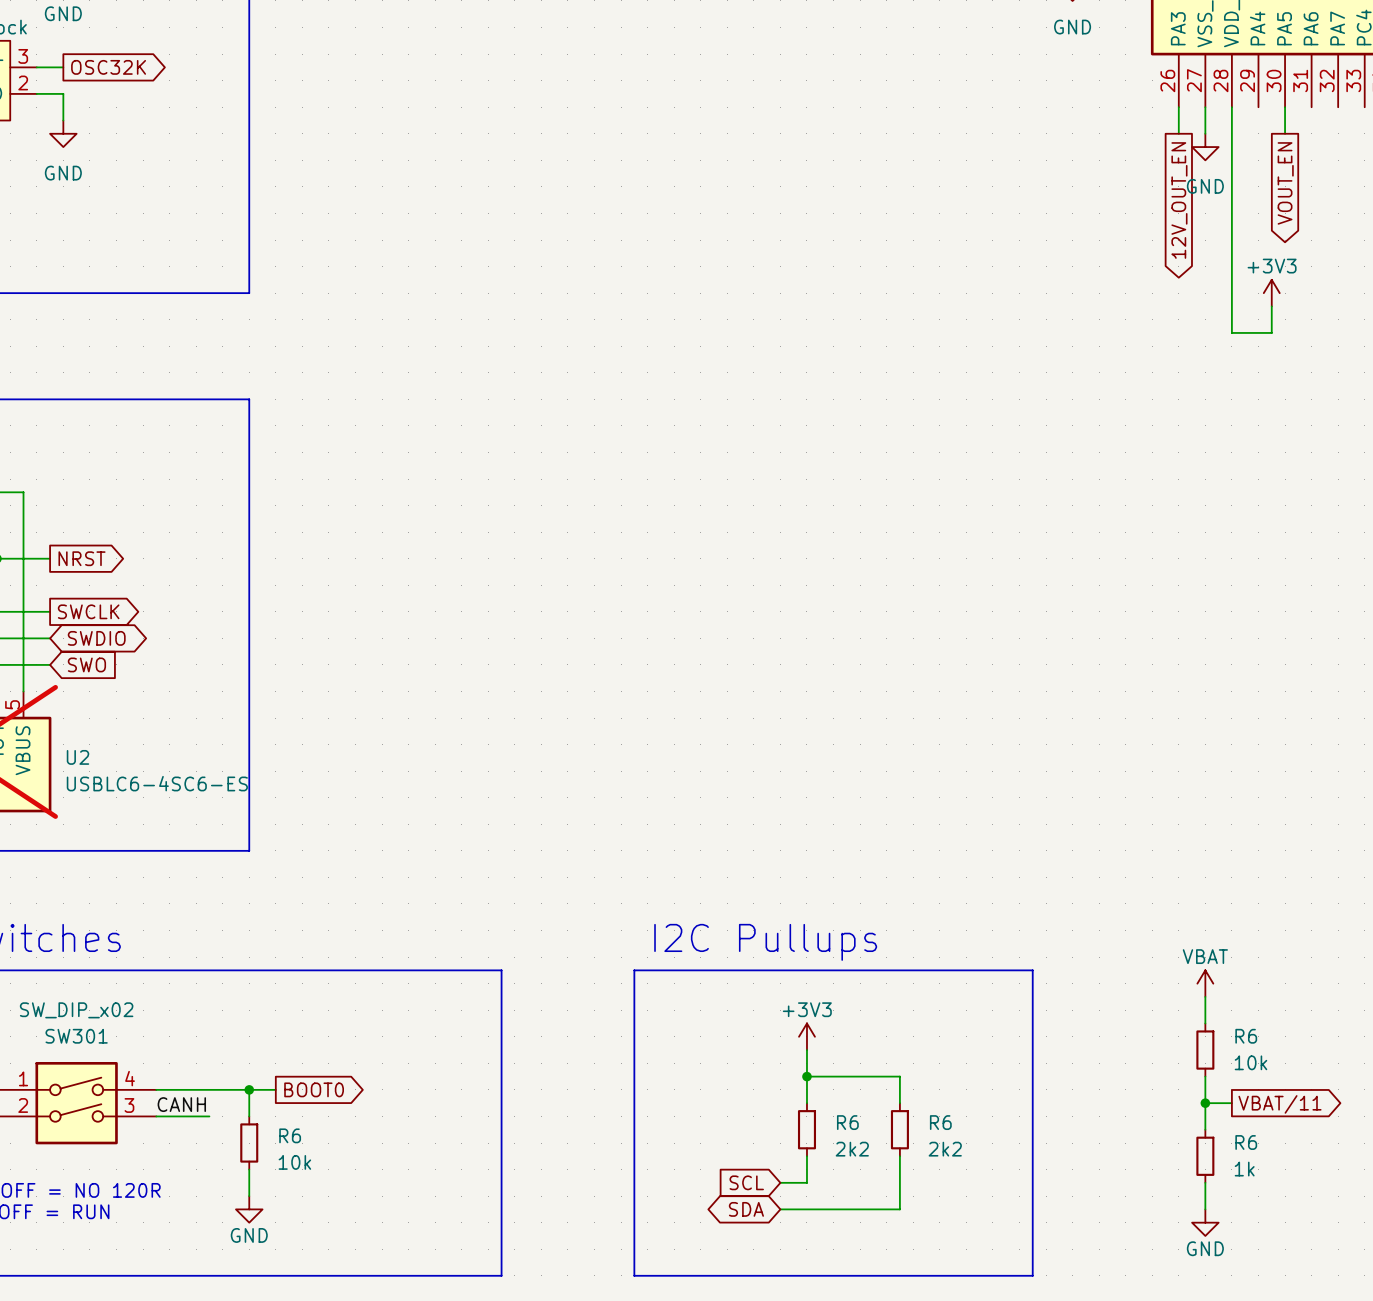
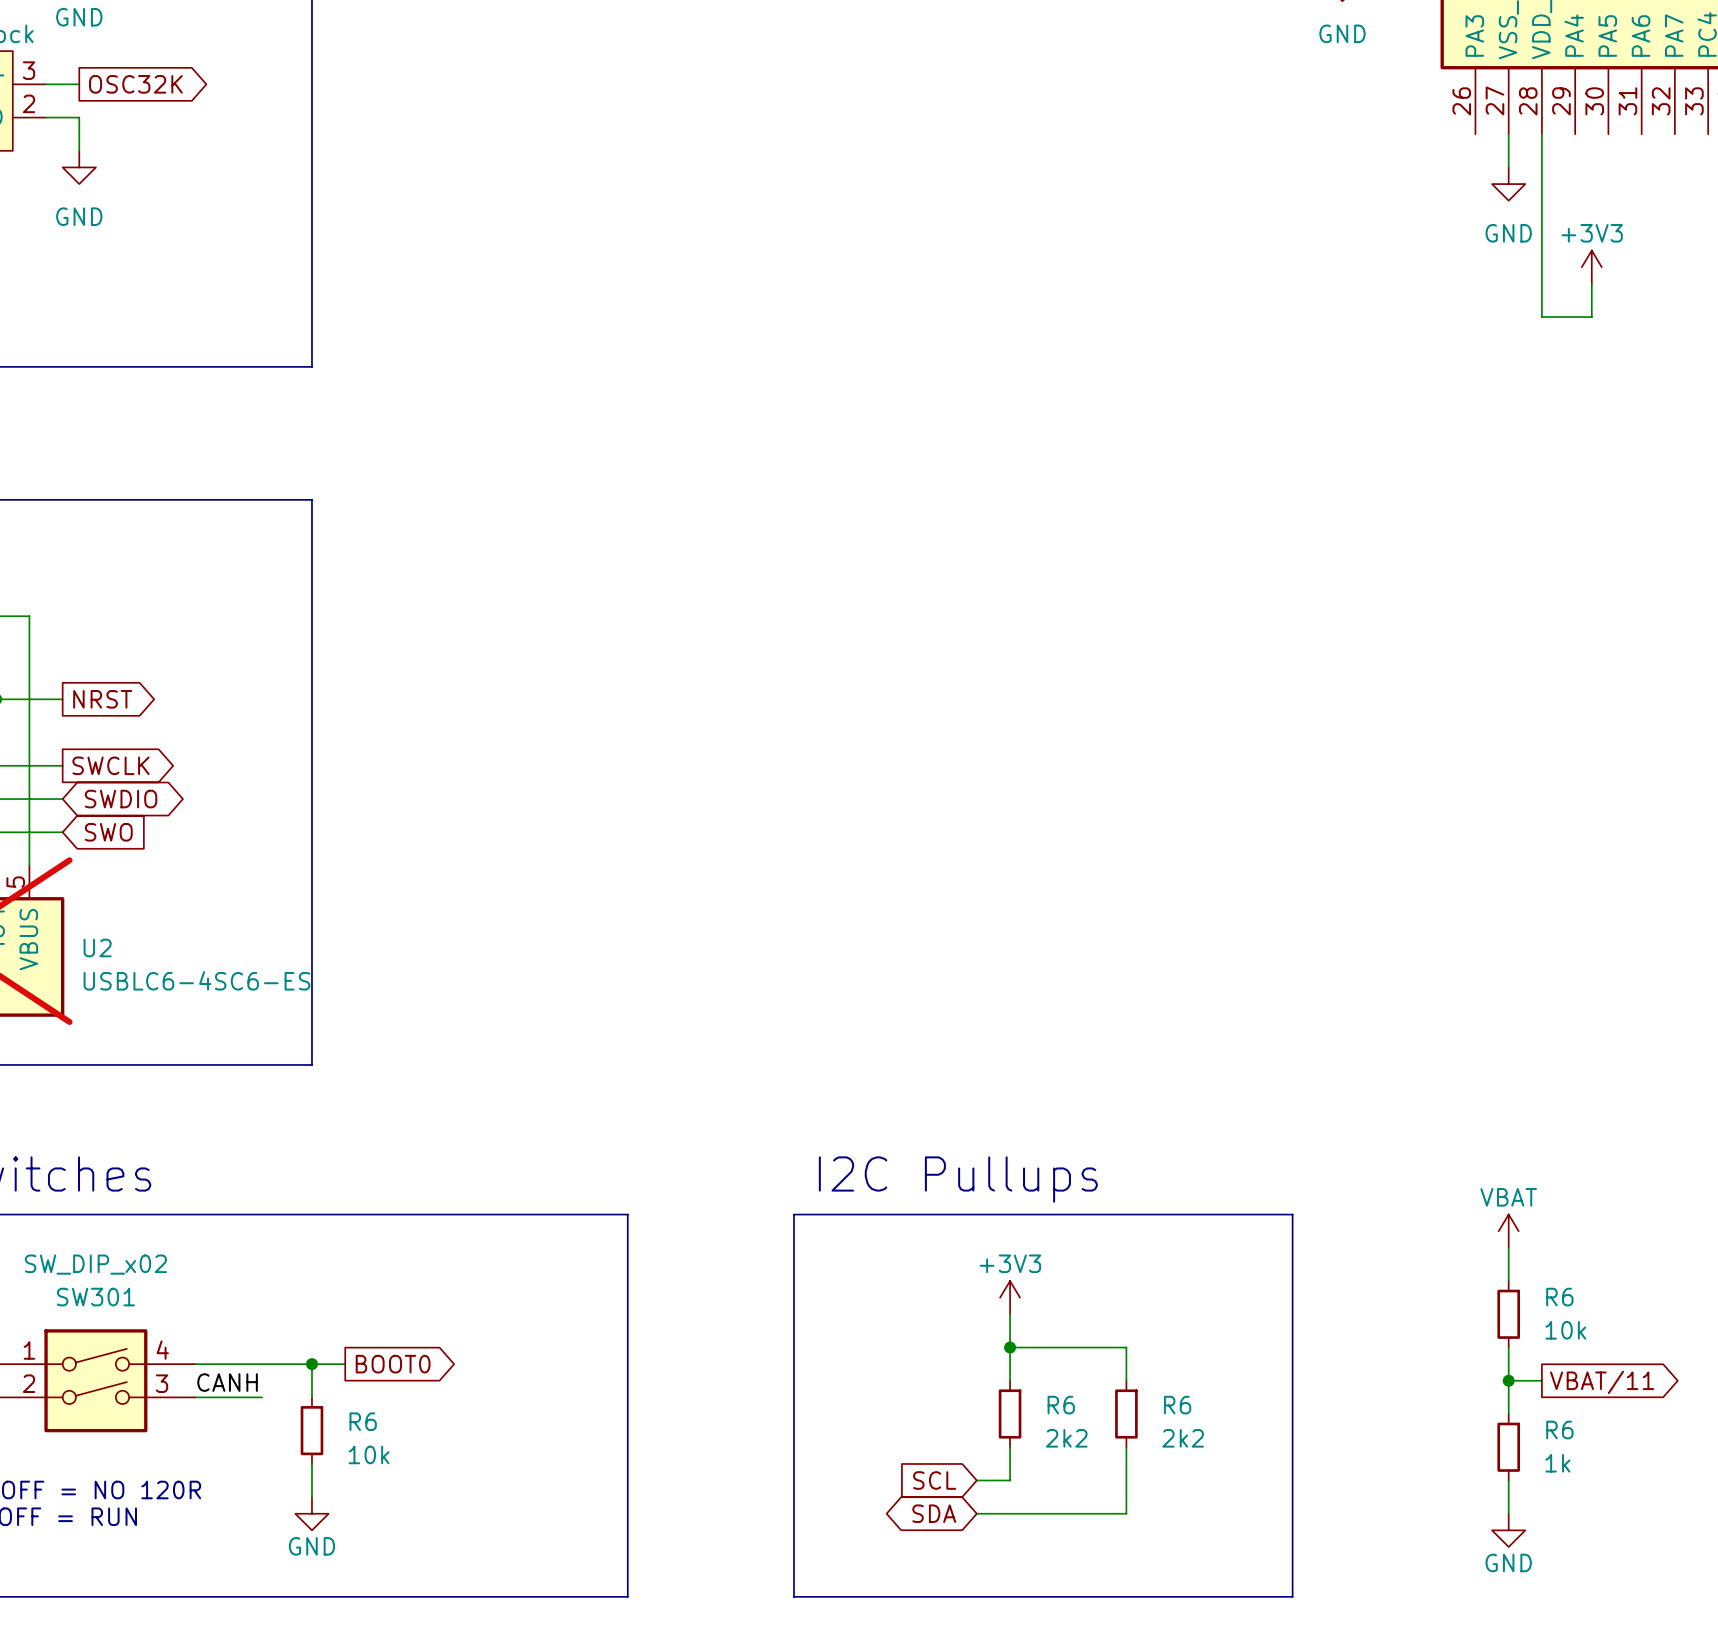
wire: (1178, 107) (1178, 133) -> none
wire: (1285, 107) (1285, 133) -> none
global label: VOUT_EN (1285, 183) -> none
global label: 12V_OUT_EN (1179, 200) -> none
wire: (1231, 253) (1231, 332) (1271, 332) (1271, 306) -> (1541, 317) (1591, 317) (1591, 283)
power symbol position: +3V3 (1271, 293) -> +3V3 (1591, 267)

